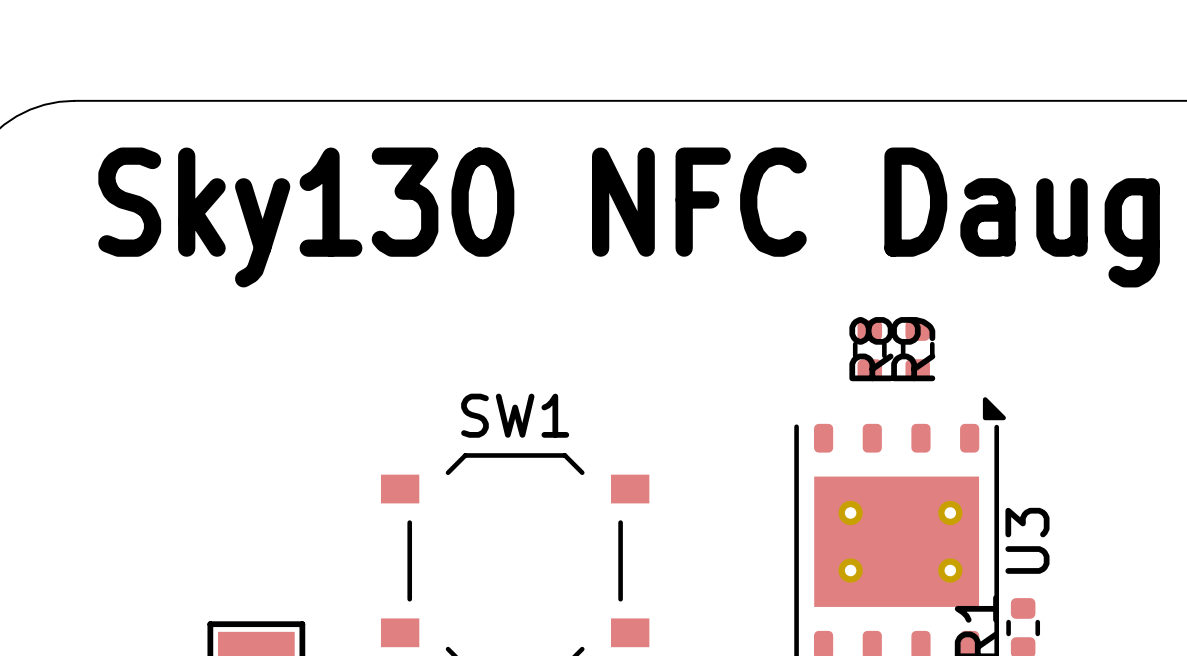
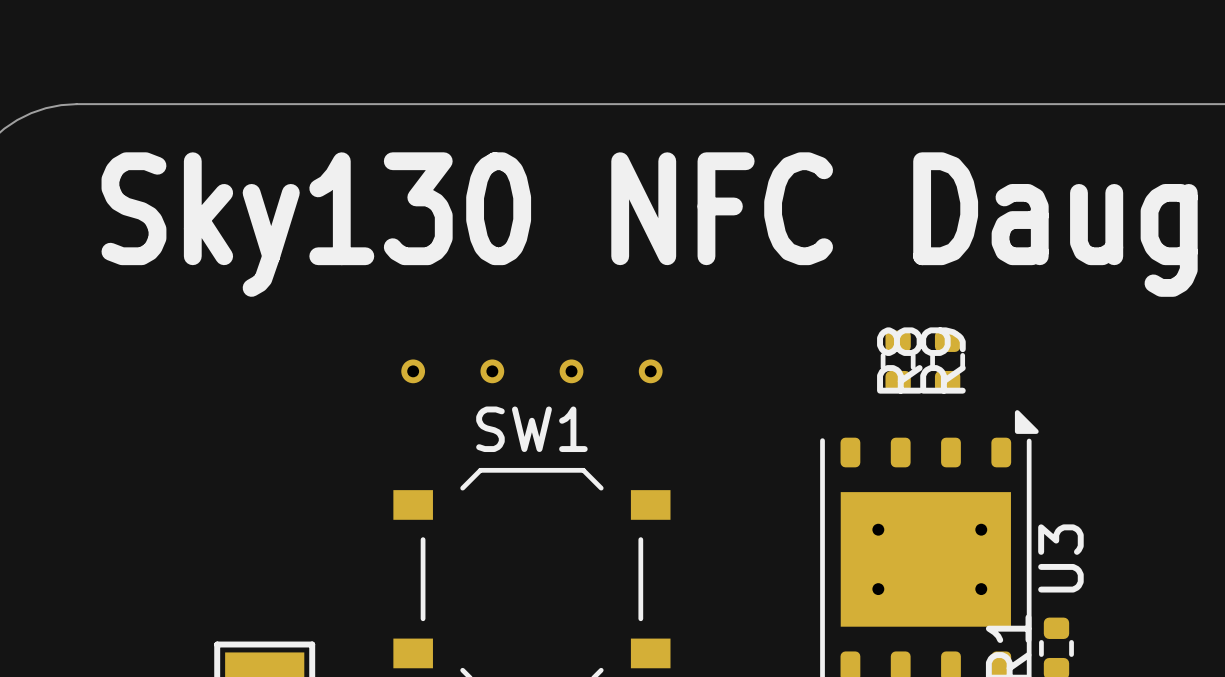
part: none -> (413, 371)
part: none -> (492, 371)
part: none -> (571, 371)
part: none -> (650, 371)

